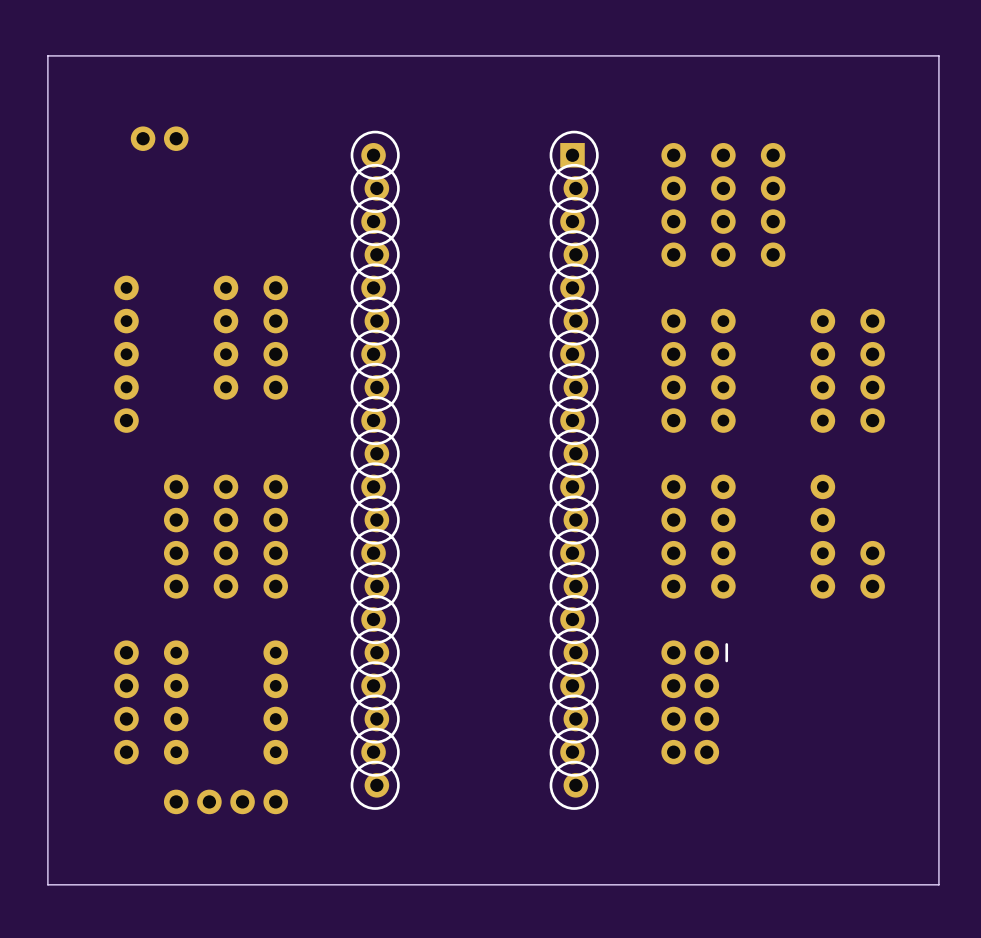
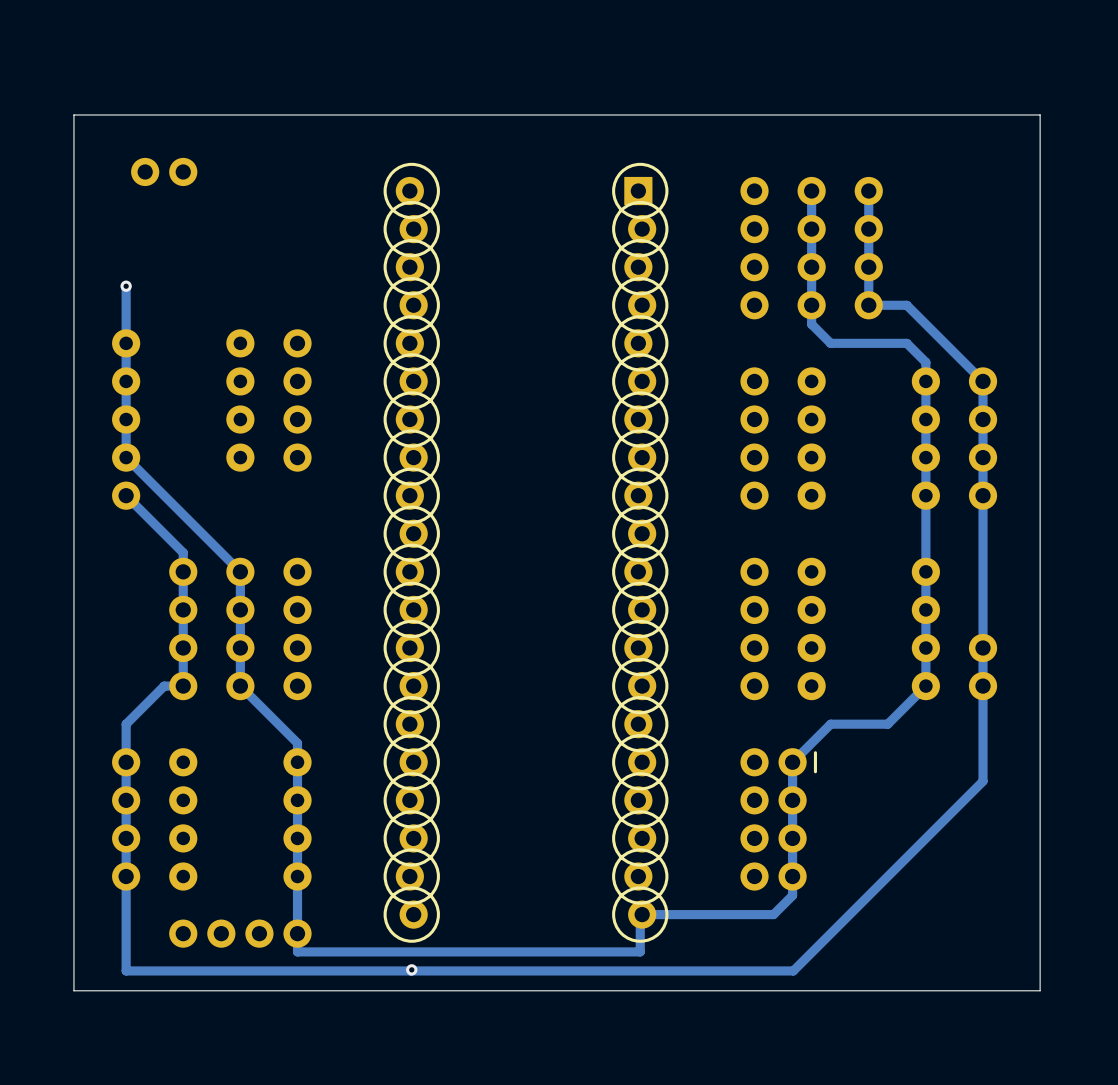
board edge: (938, 55) (47, 55) (47, 884) (938, 884) (938, 55) -> (1040, 114) (1040, 990) (73, 990) (73, 114) (1040, 114)
track: none -> (811, 191) (811, 324) (830, 343) (906, 343) (925, 362) (925, 686) (887, 724) (830, 724) (792, 762) (792, 895) (773, 914) (642, 914) (640, 916) (640, 951) (297, 951) (297, 743) (240, 686) (240, 571) (126, 457) (126, 286)
track: none -> (868, 191) (868, 305) (906, 305) (983, 381) (983, 781) (793, 970) (411, 970)
via: none -> (126, 286)
track: none -> (126, 495) (183, 552) (183, 686) (164, 686) (126, 724) (126, 970) (411, 969)
via: none -> (411, 969)

